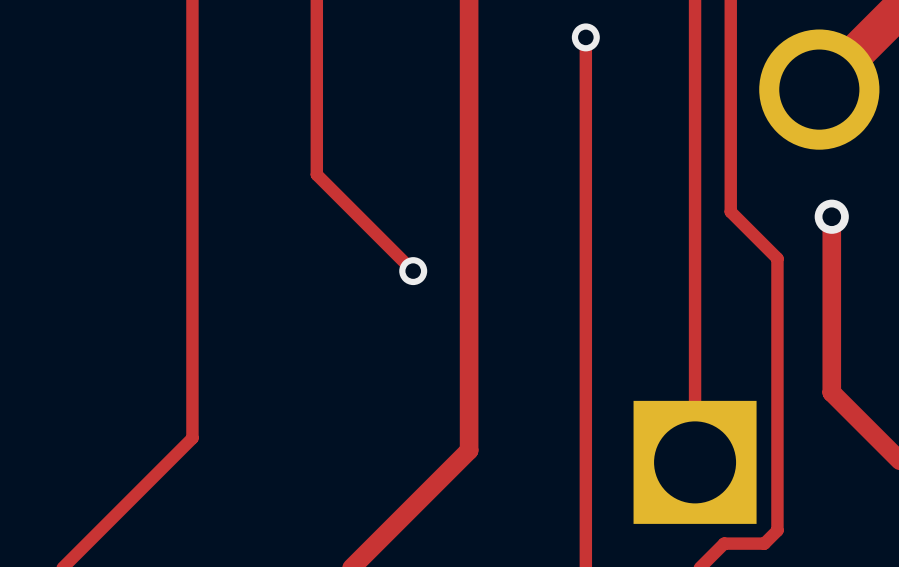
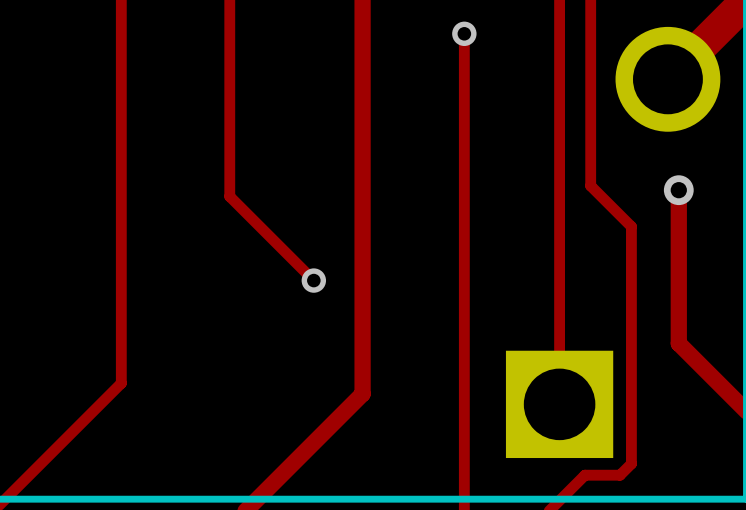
track: (316, 174) (413, 271) -> (229, 153) (229, 196) (313, 280)
via position: (413, 271) -> (313, 280)

